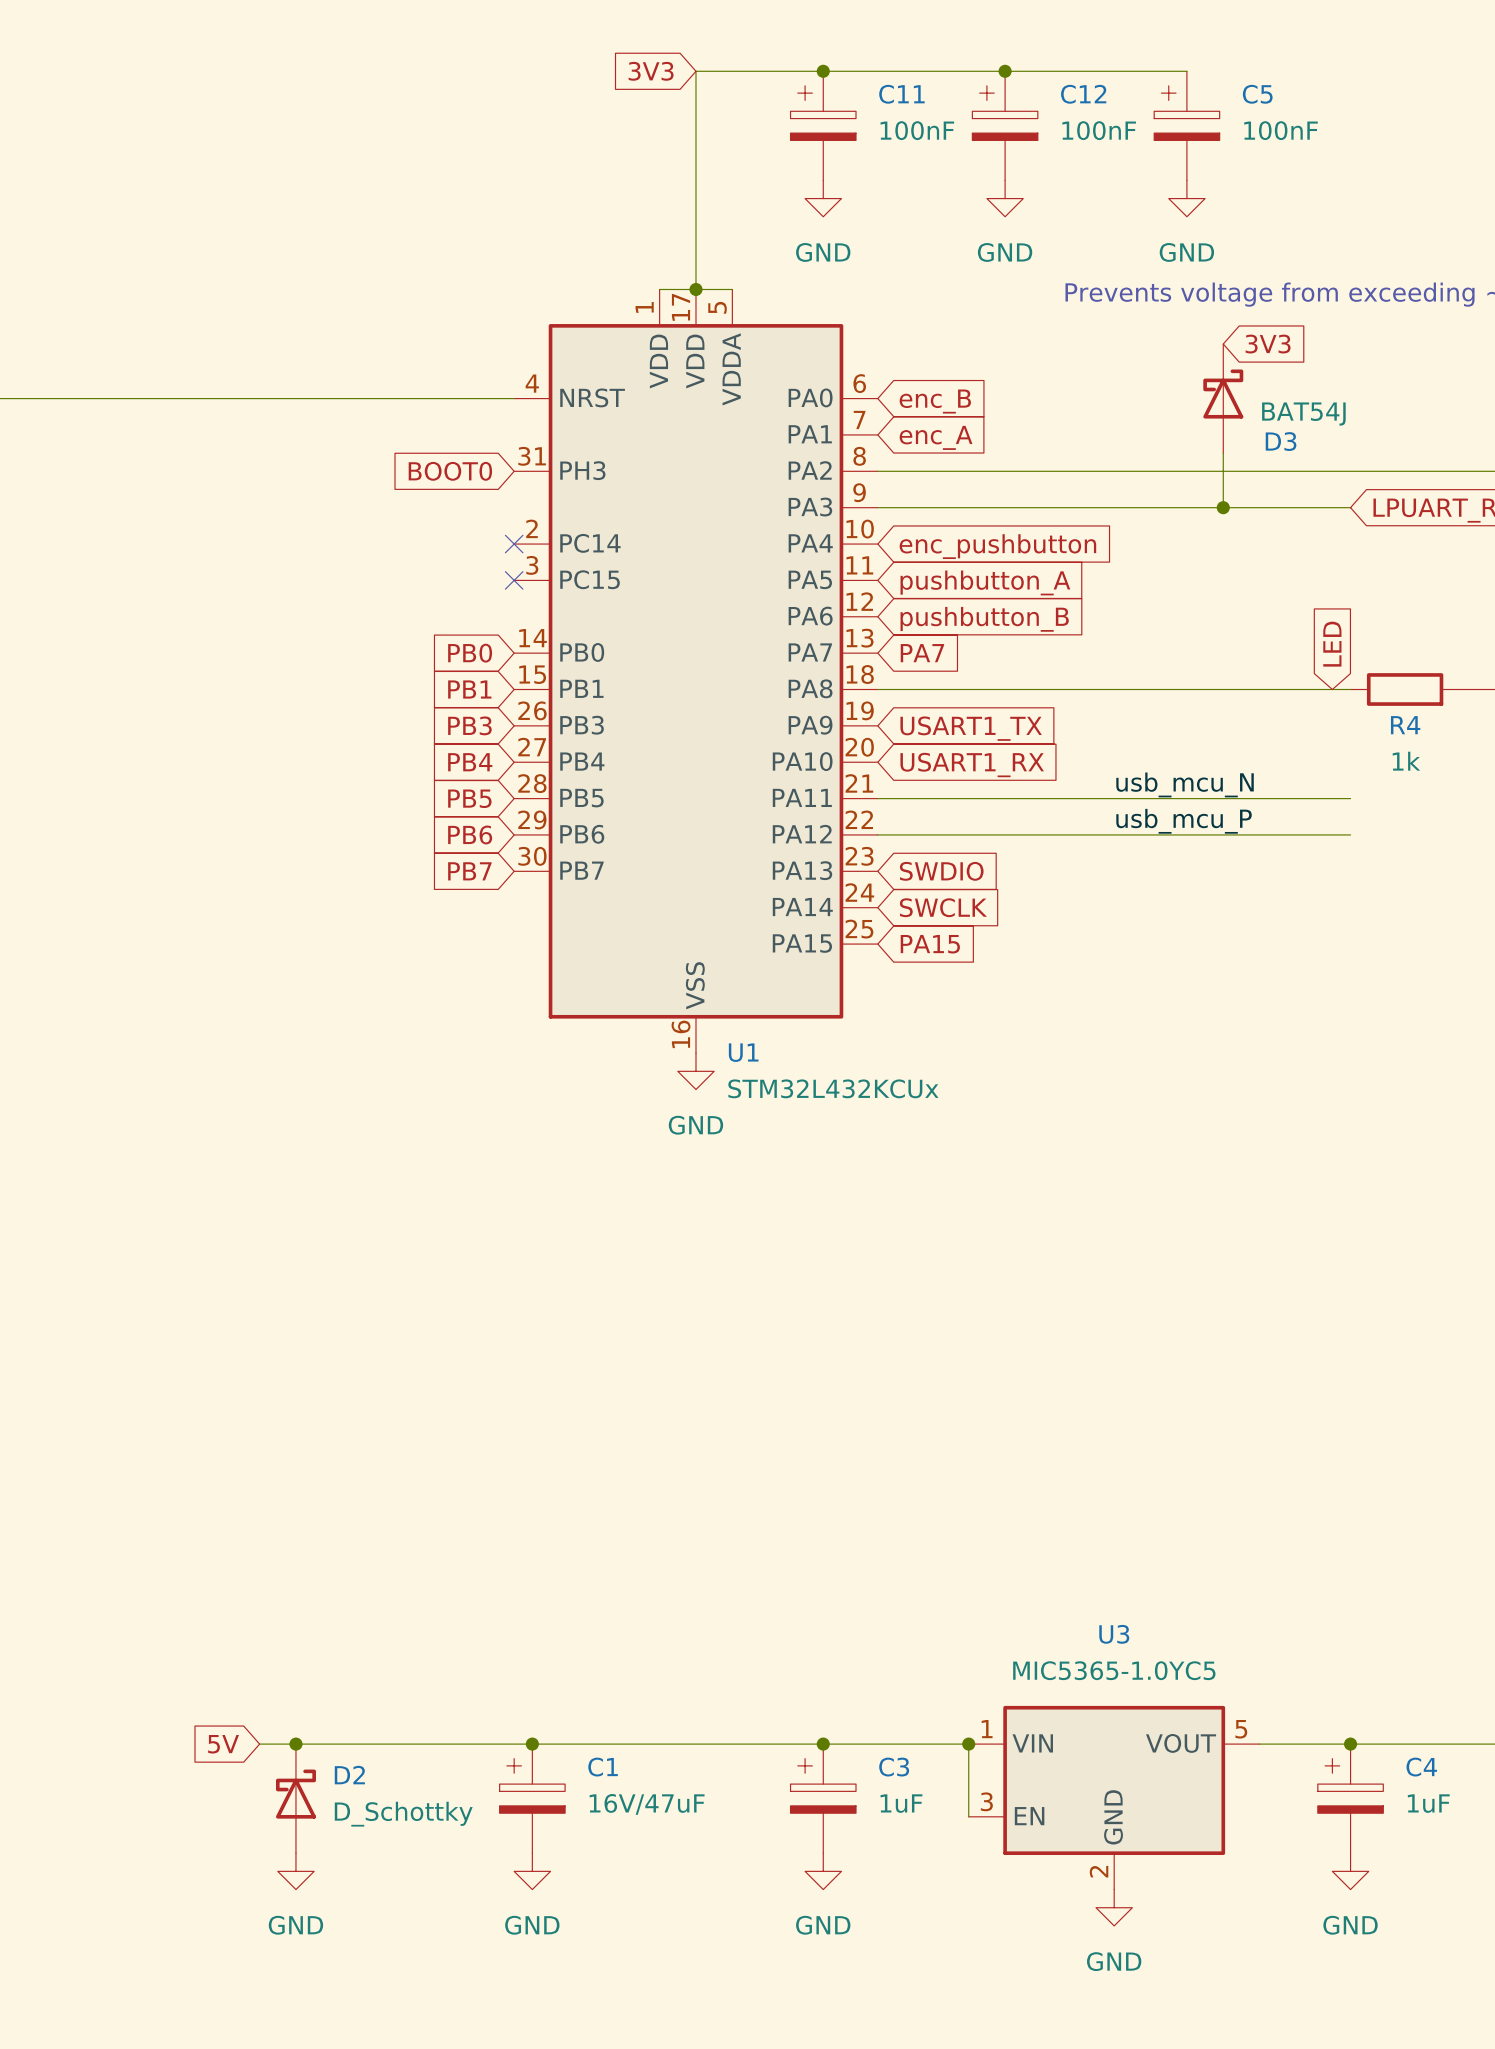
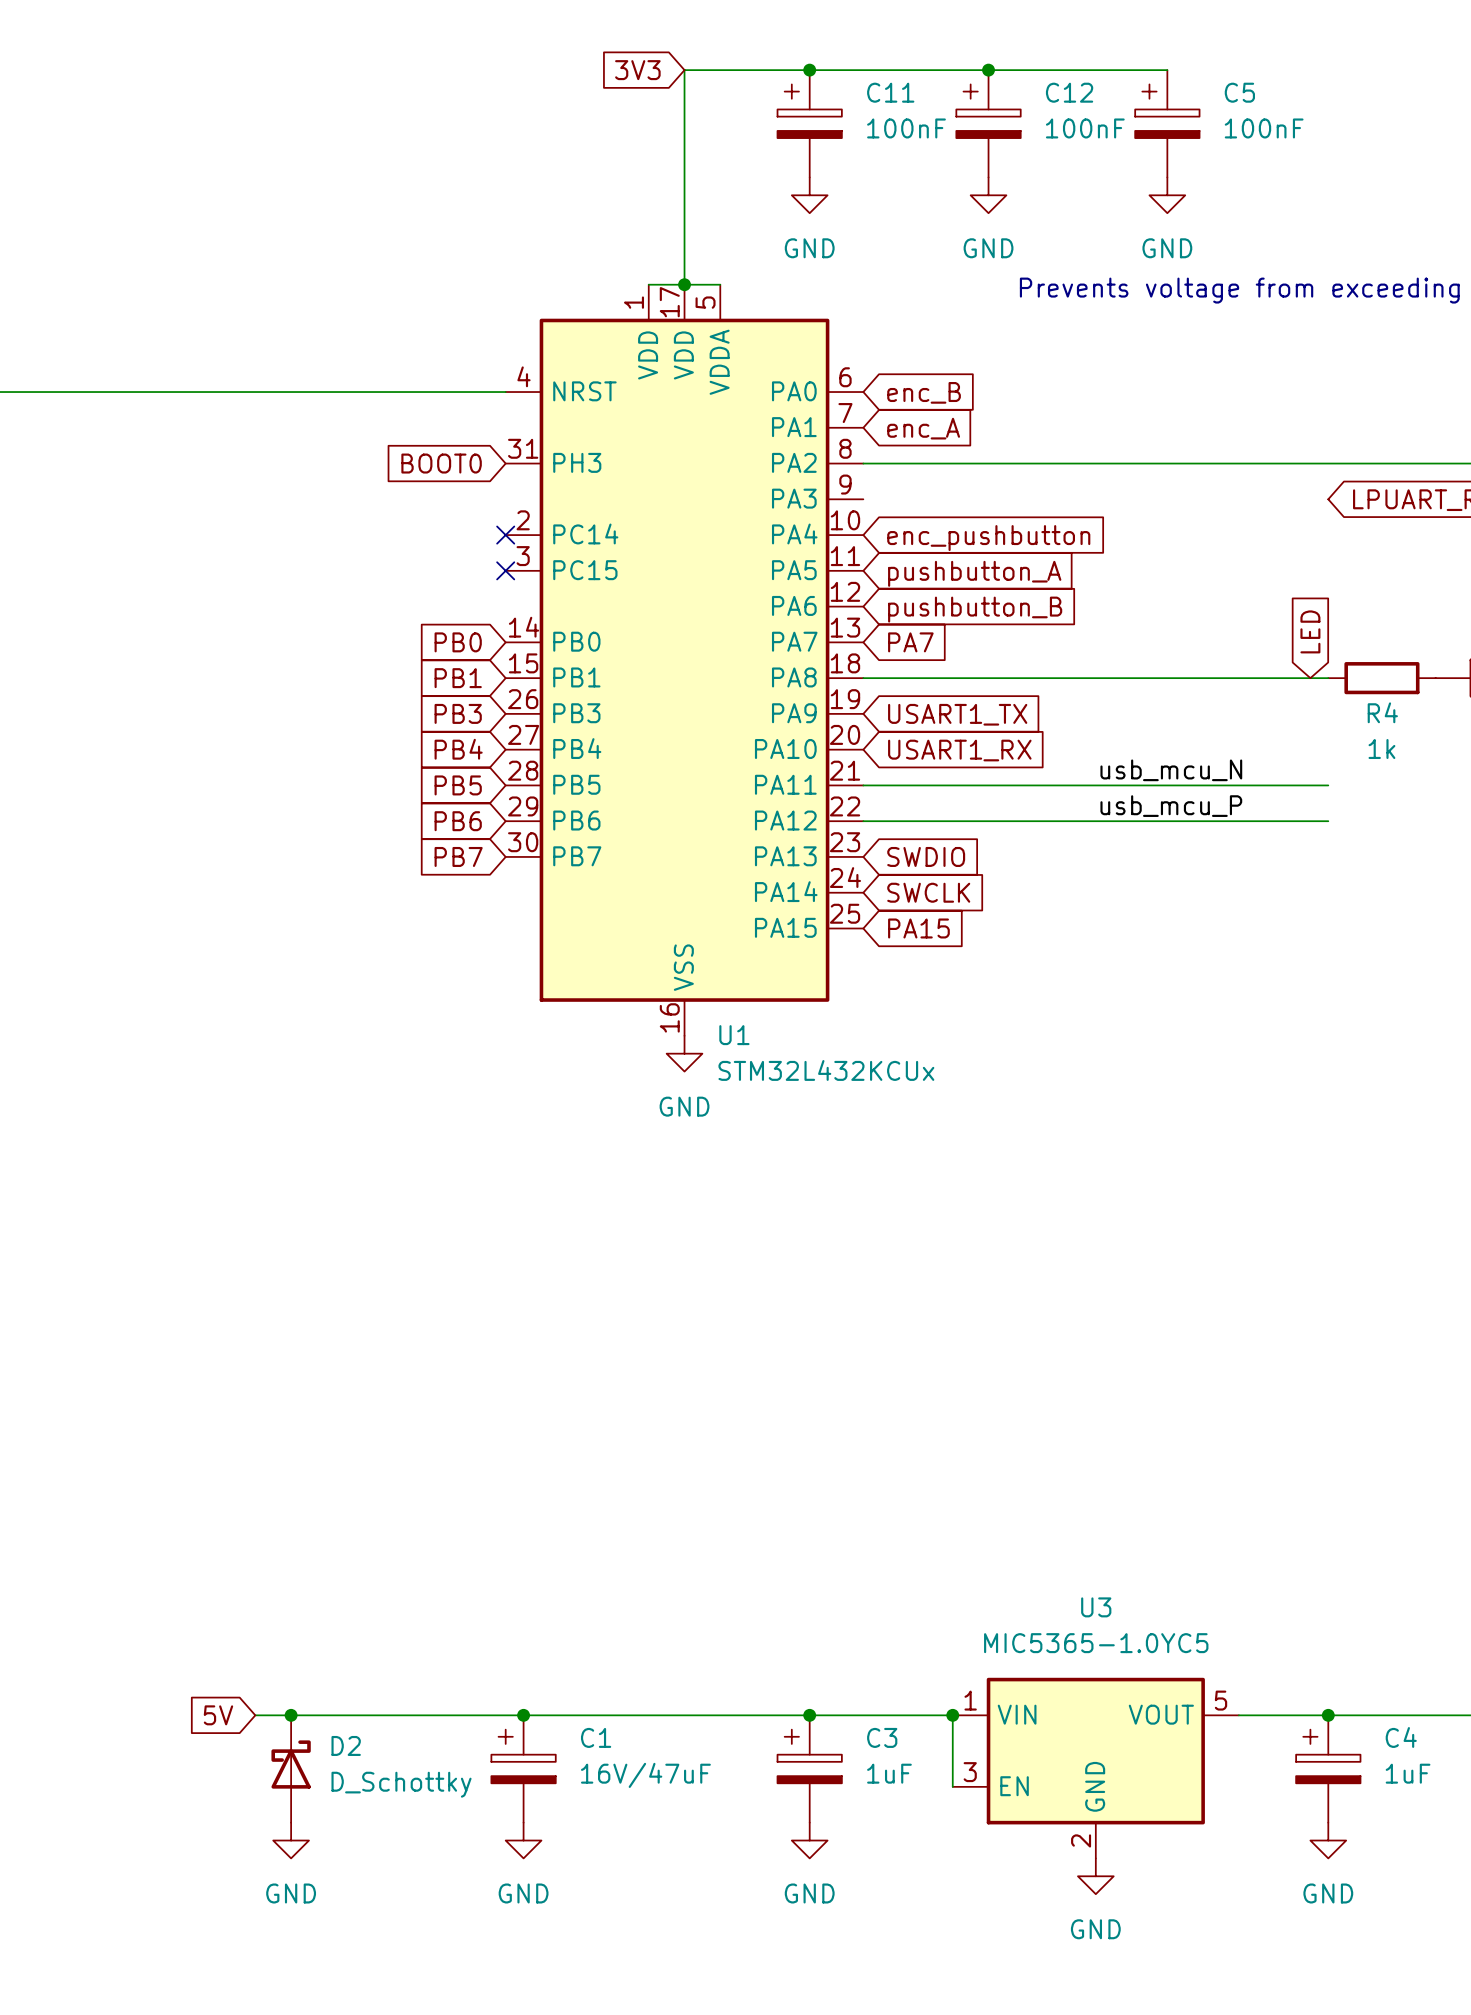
global label: 3V3 (1268, 344) -> none
D3: BAT54J (1223, 398) -> none
wire: (1223, 453) (1223, 507) -> none
wire: (877, 507) (1350, 507) -> none
junction: (1223, 507) -> none

